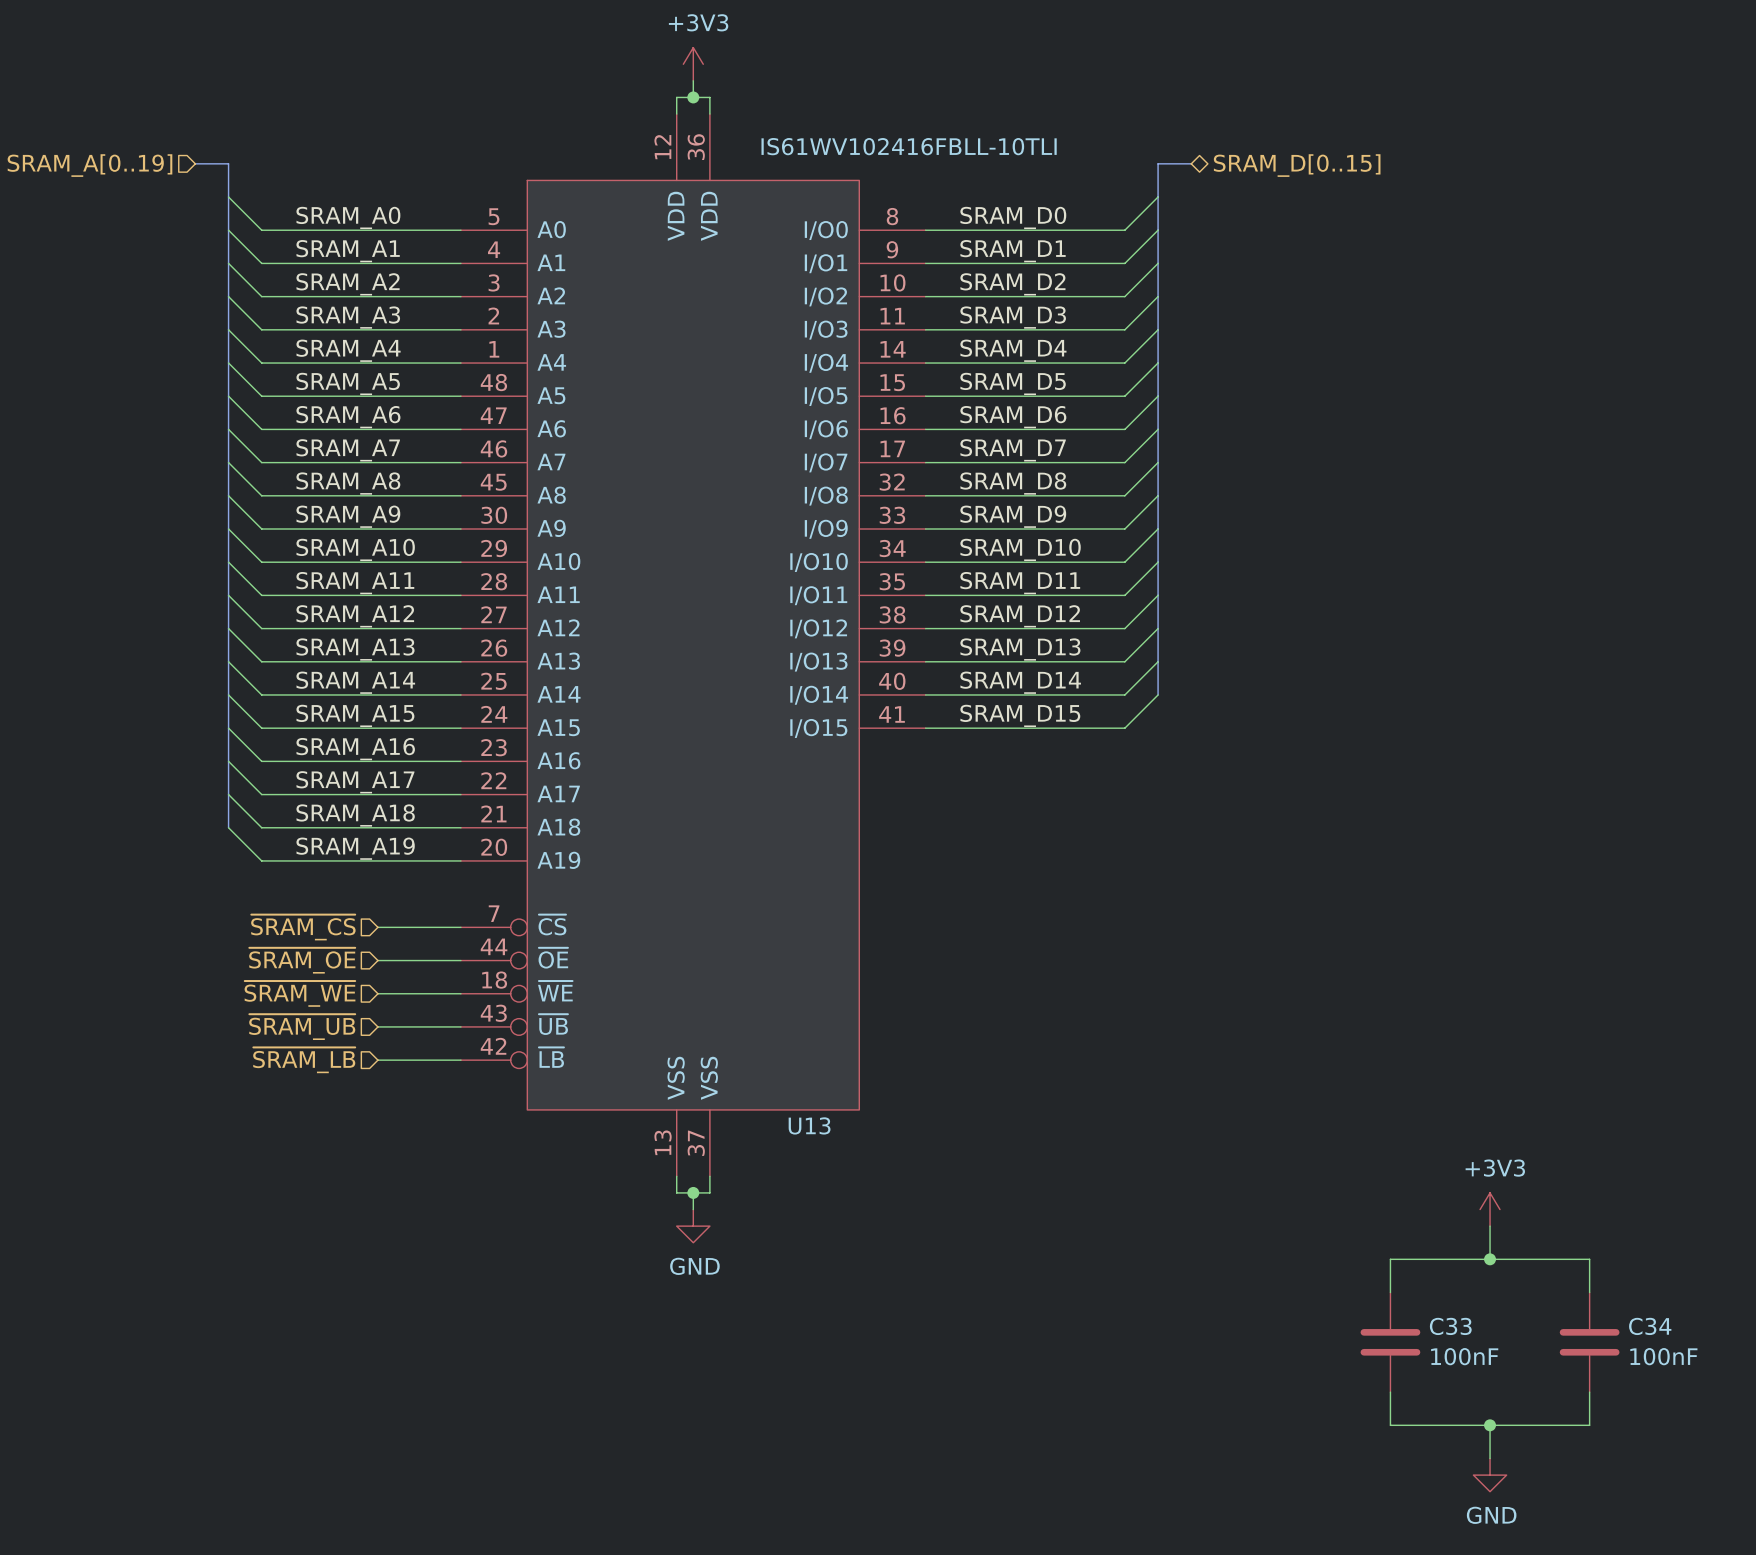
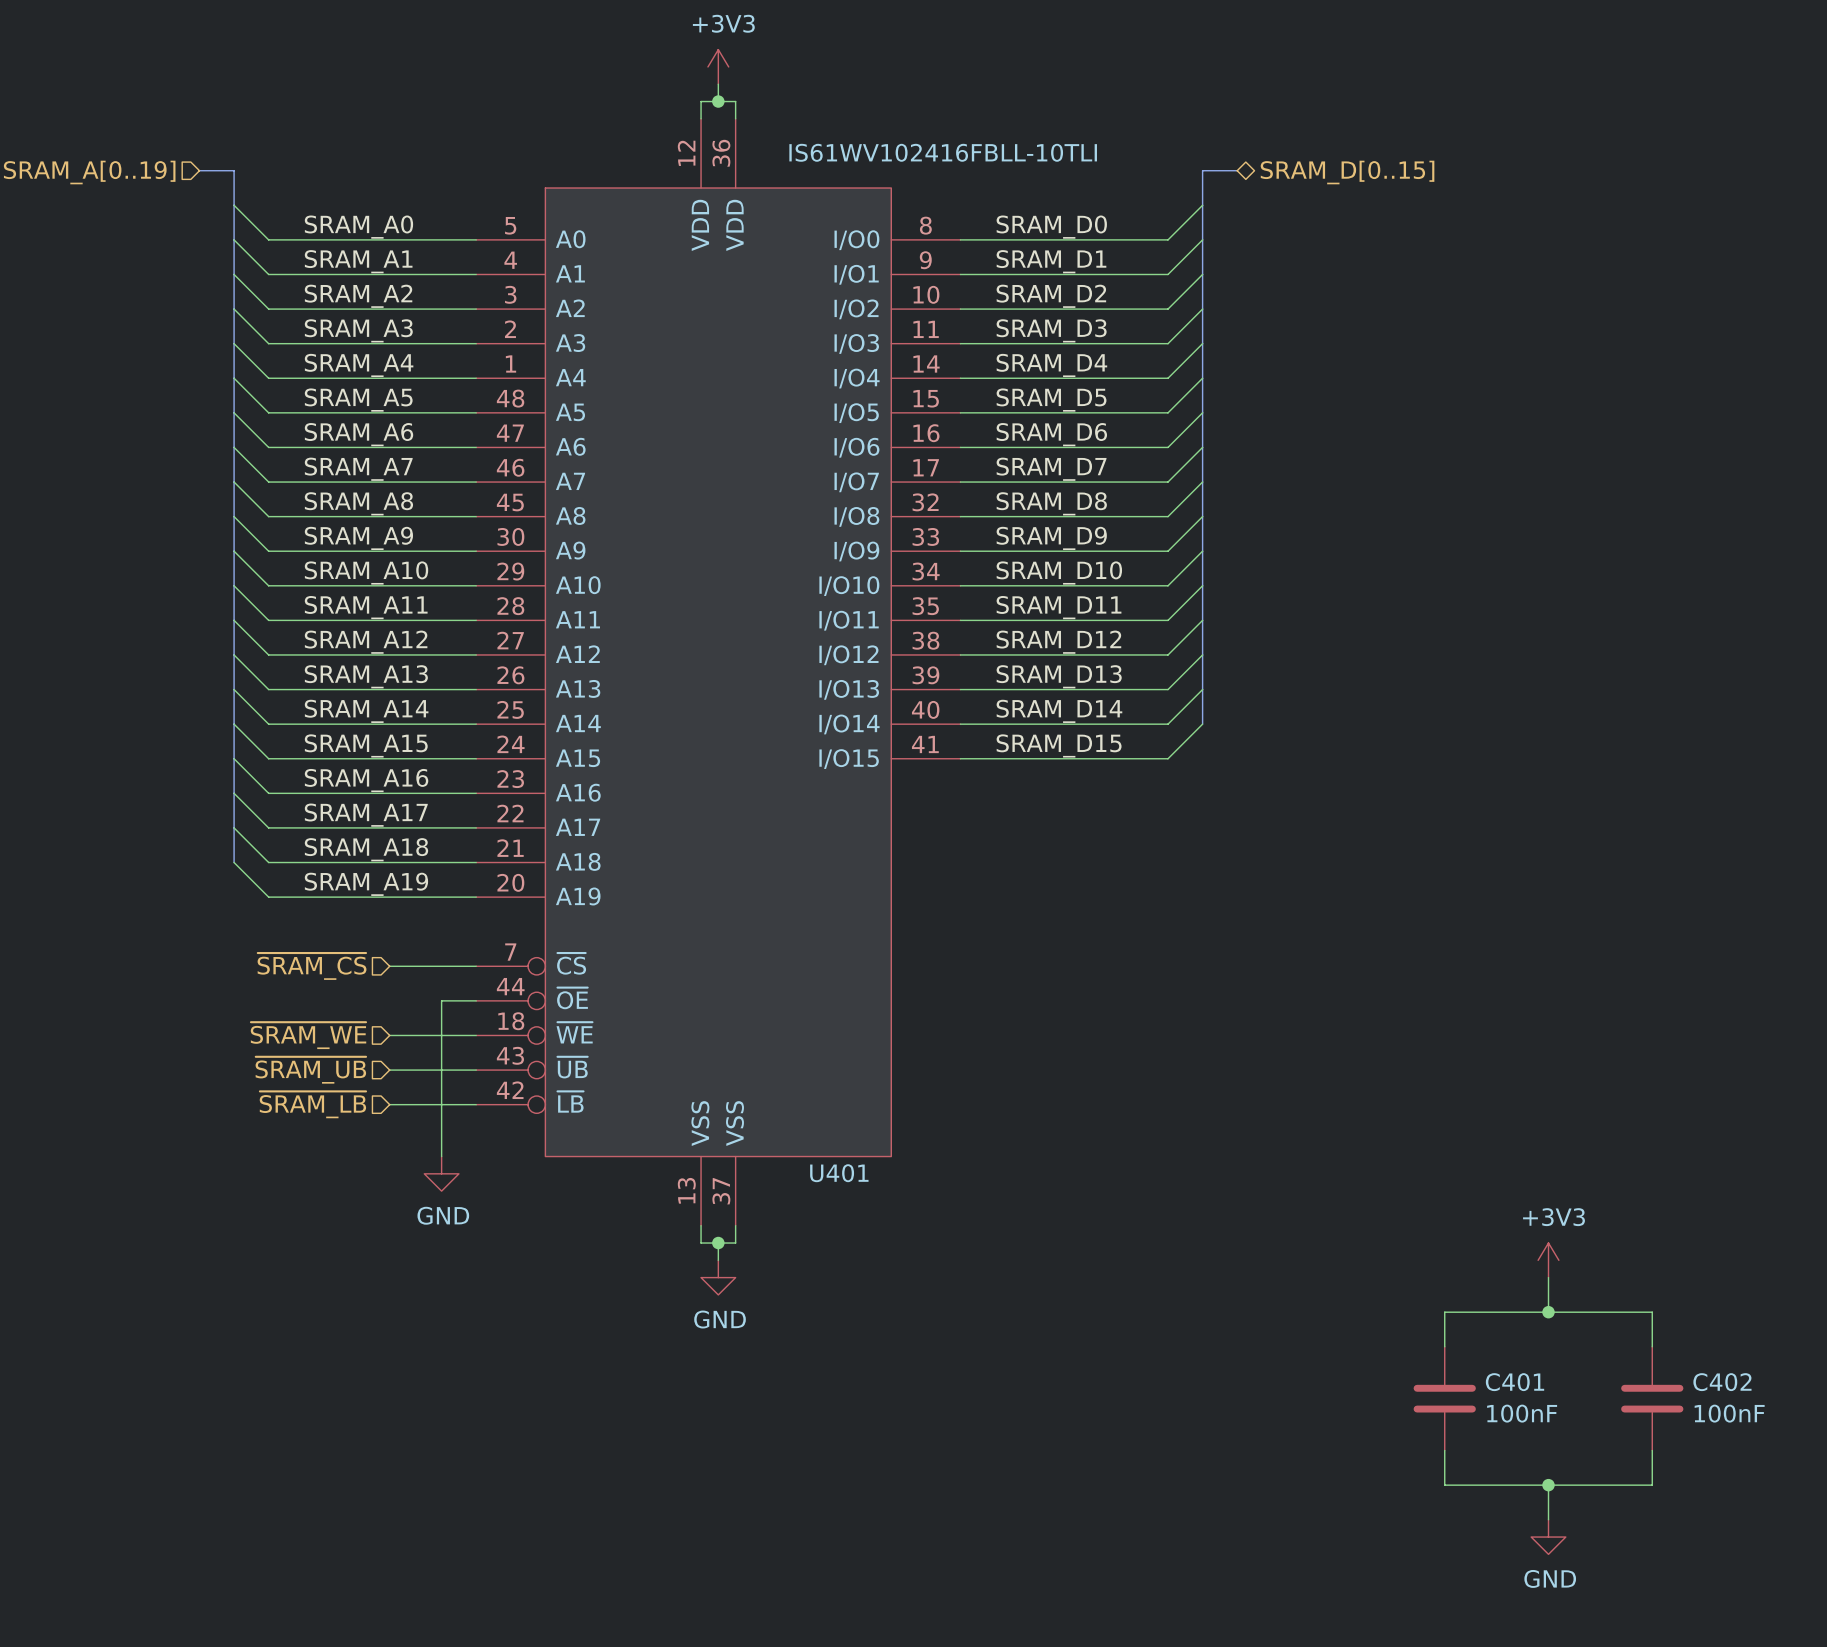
hierarchical label: ~{SRAM_OE} (302, 960) -> none
wire: (377, 960) (427, 960) -> (441, 1156) (441, 1000)
U13 name: U13 (809, 1125) -> U401 (839, 1173)
power symbol: none -> GND (441, 1173)
C33 name: C33 (1450, 1326) -> C401 (1515, 1382)
C34 name: C34 (1650, 1326) -> C402 (1722, 1382)

